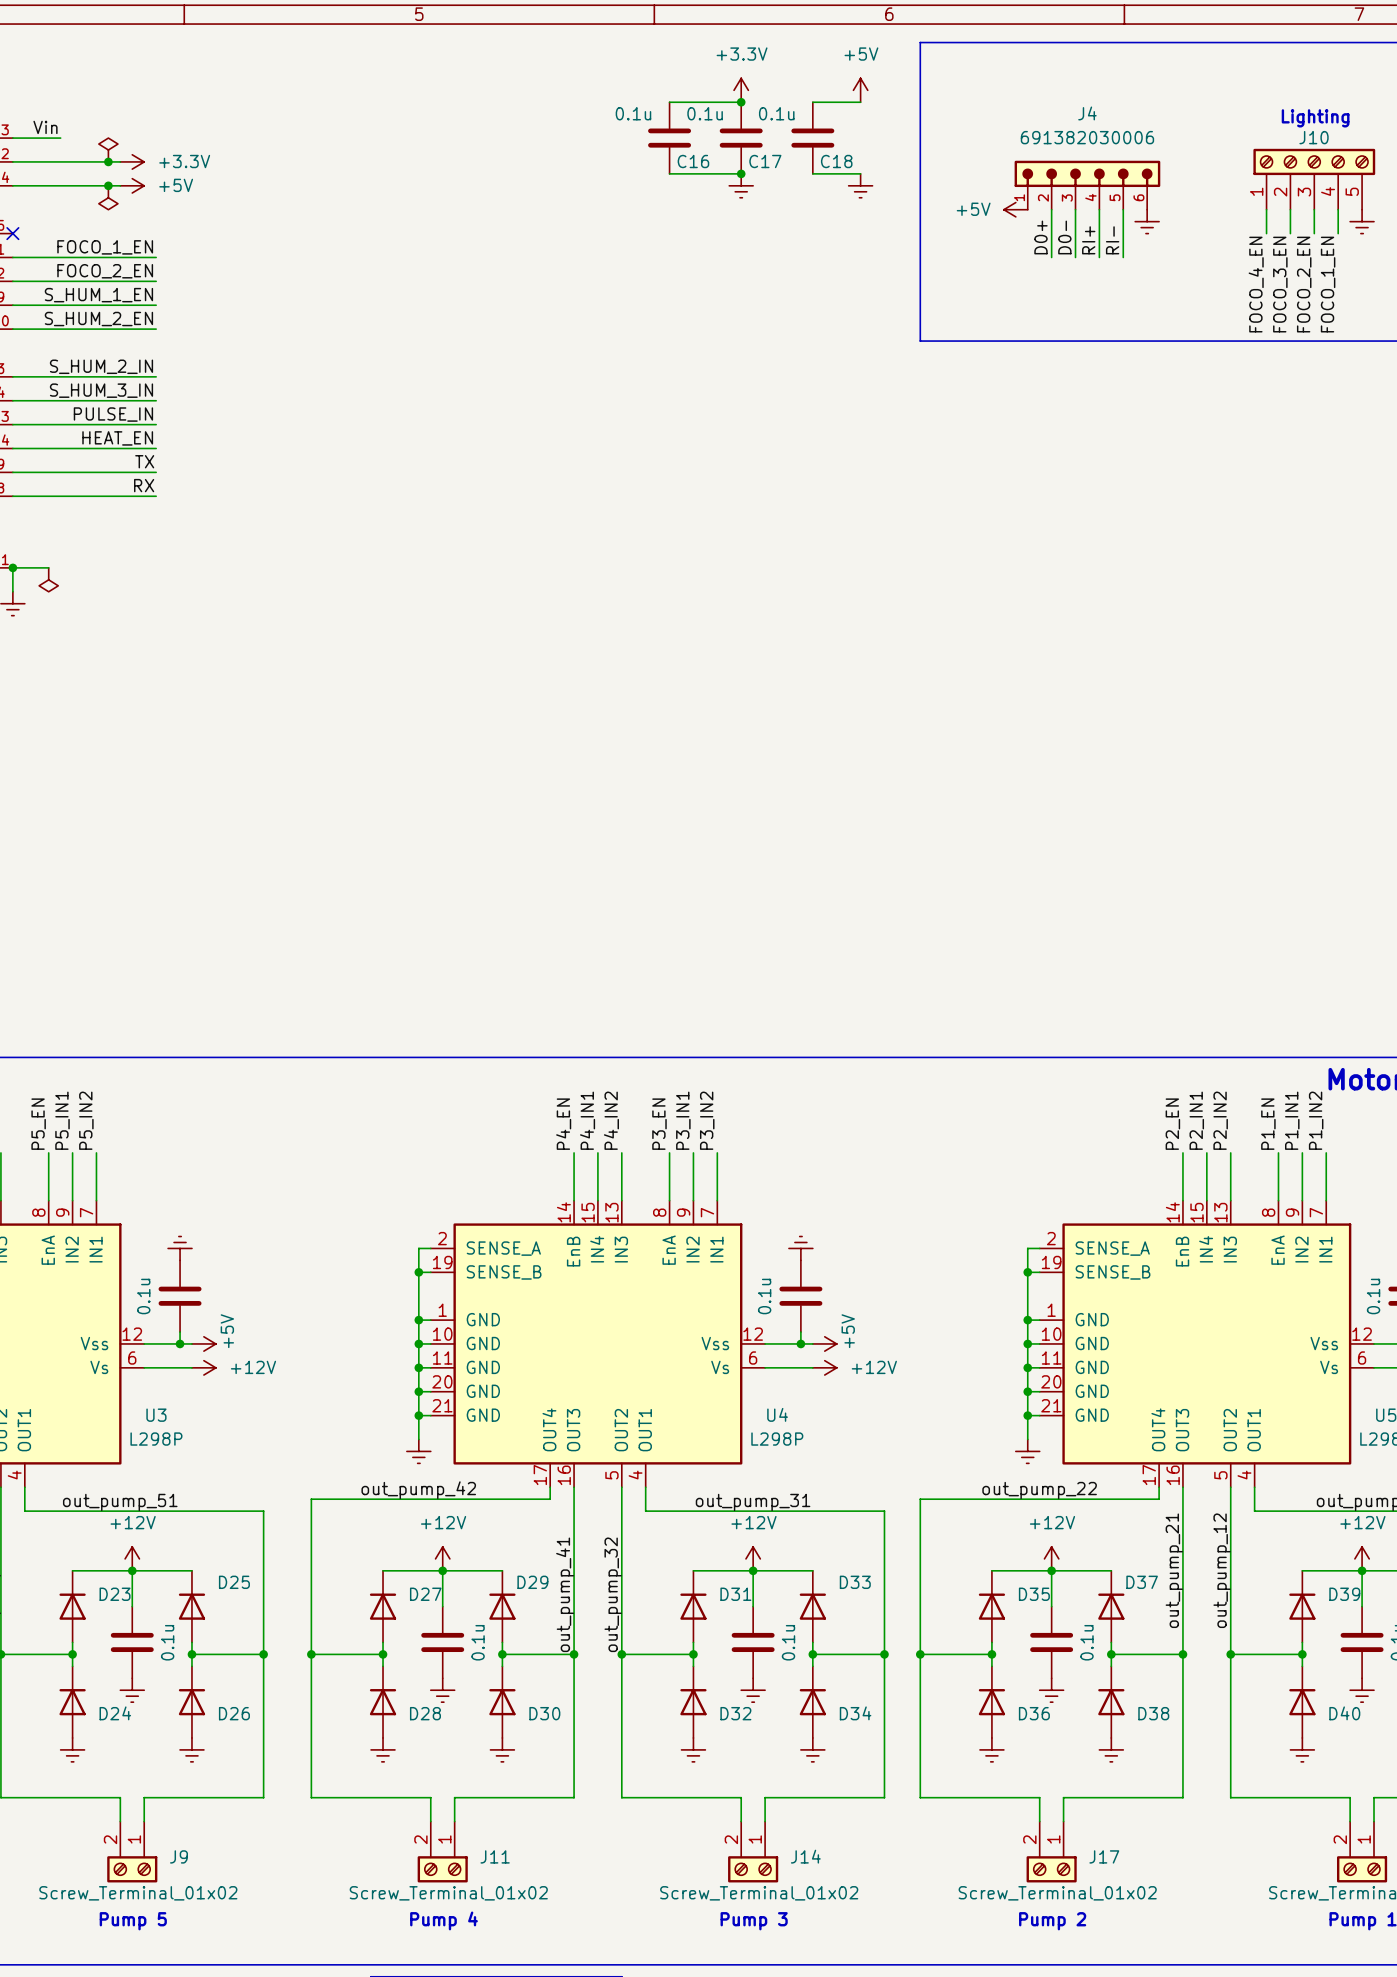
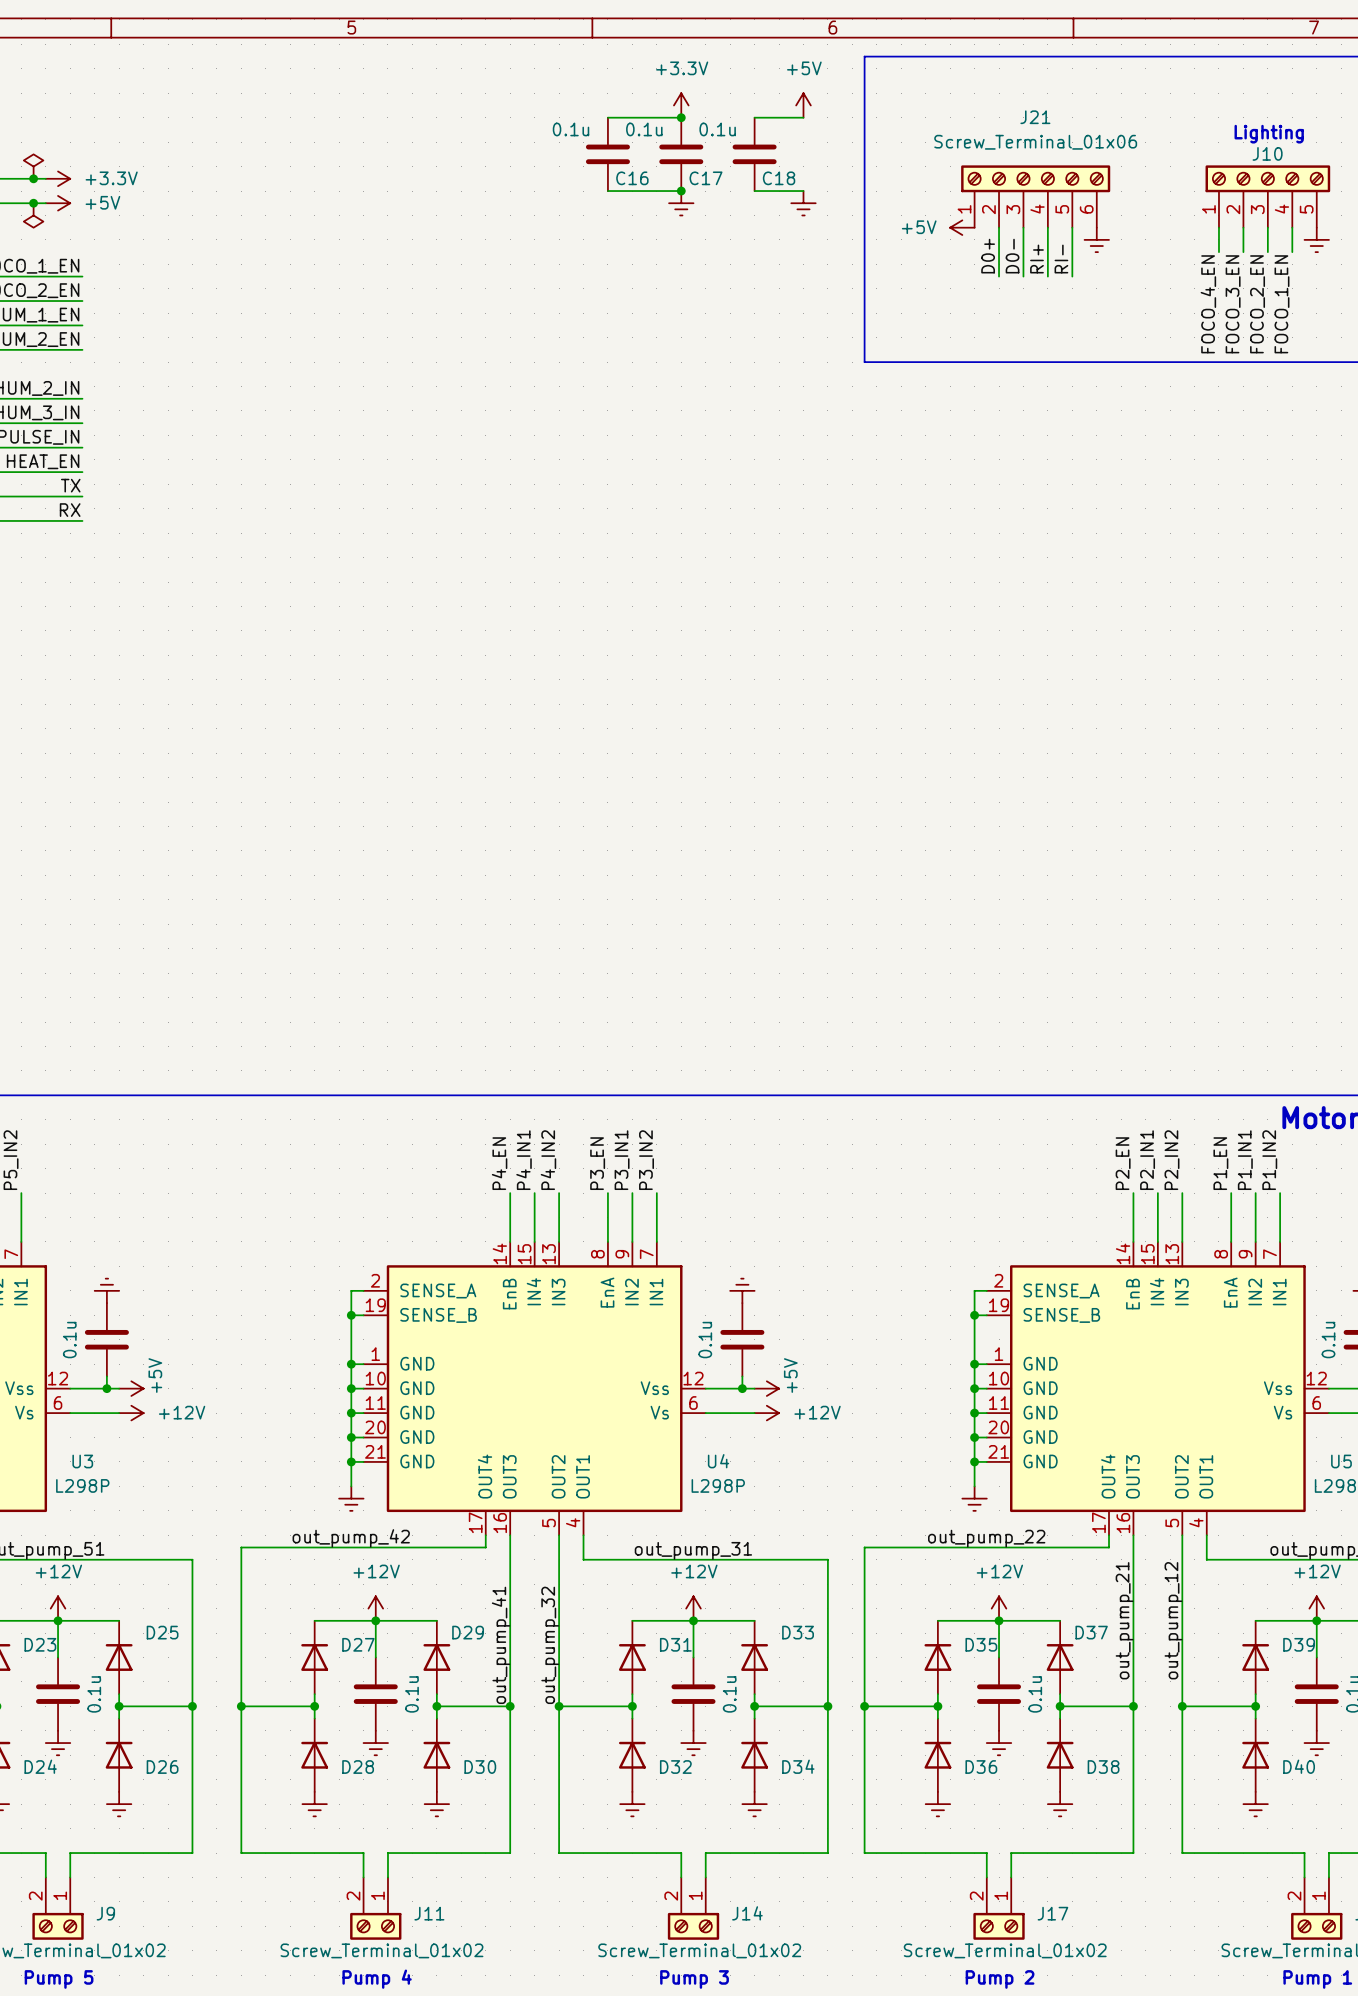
J21: none -> Screw_Terminal_01x06 (1035, 196)
J4: 691382030006 (1087, 185) -> none

